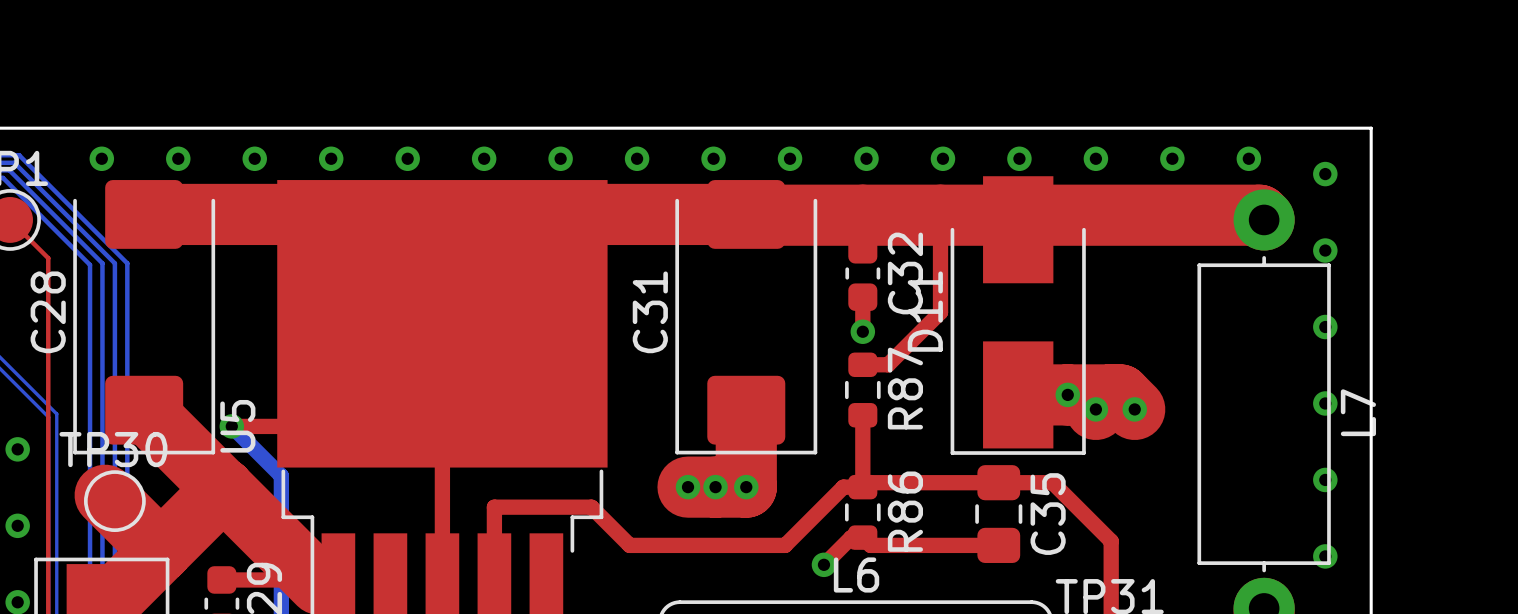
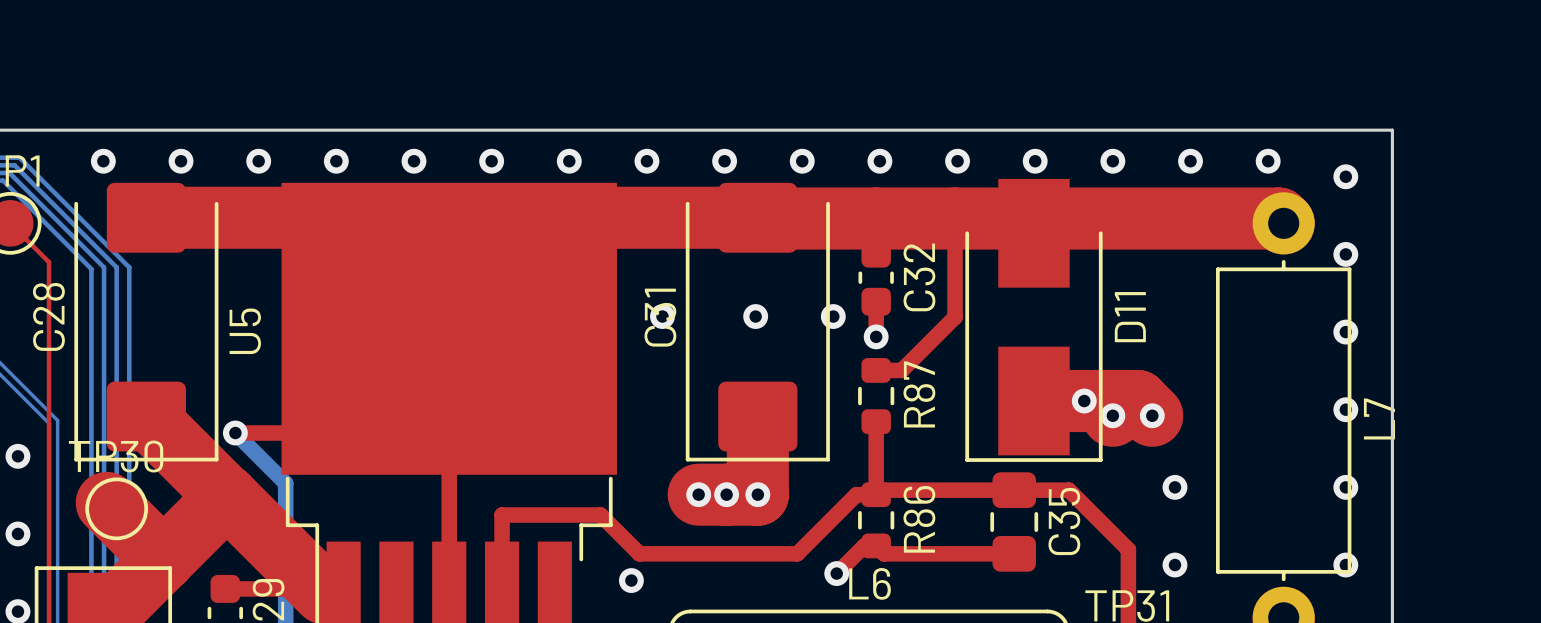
via: none -> (662, 316)
via: none -> (755, 316)
via: none -> (833, 316)
D11 name position: D11 (925, 311) -> D11 (1130, 317)
U5 name position: U5 (237, 426) -> U5 (245, 331)
via: none -> (1174, 487)
via: none -> (1174, 565)
via: none -> (631, 580)

